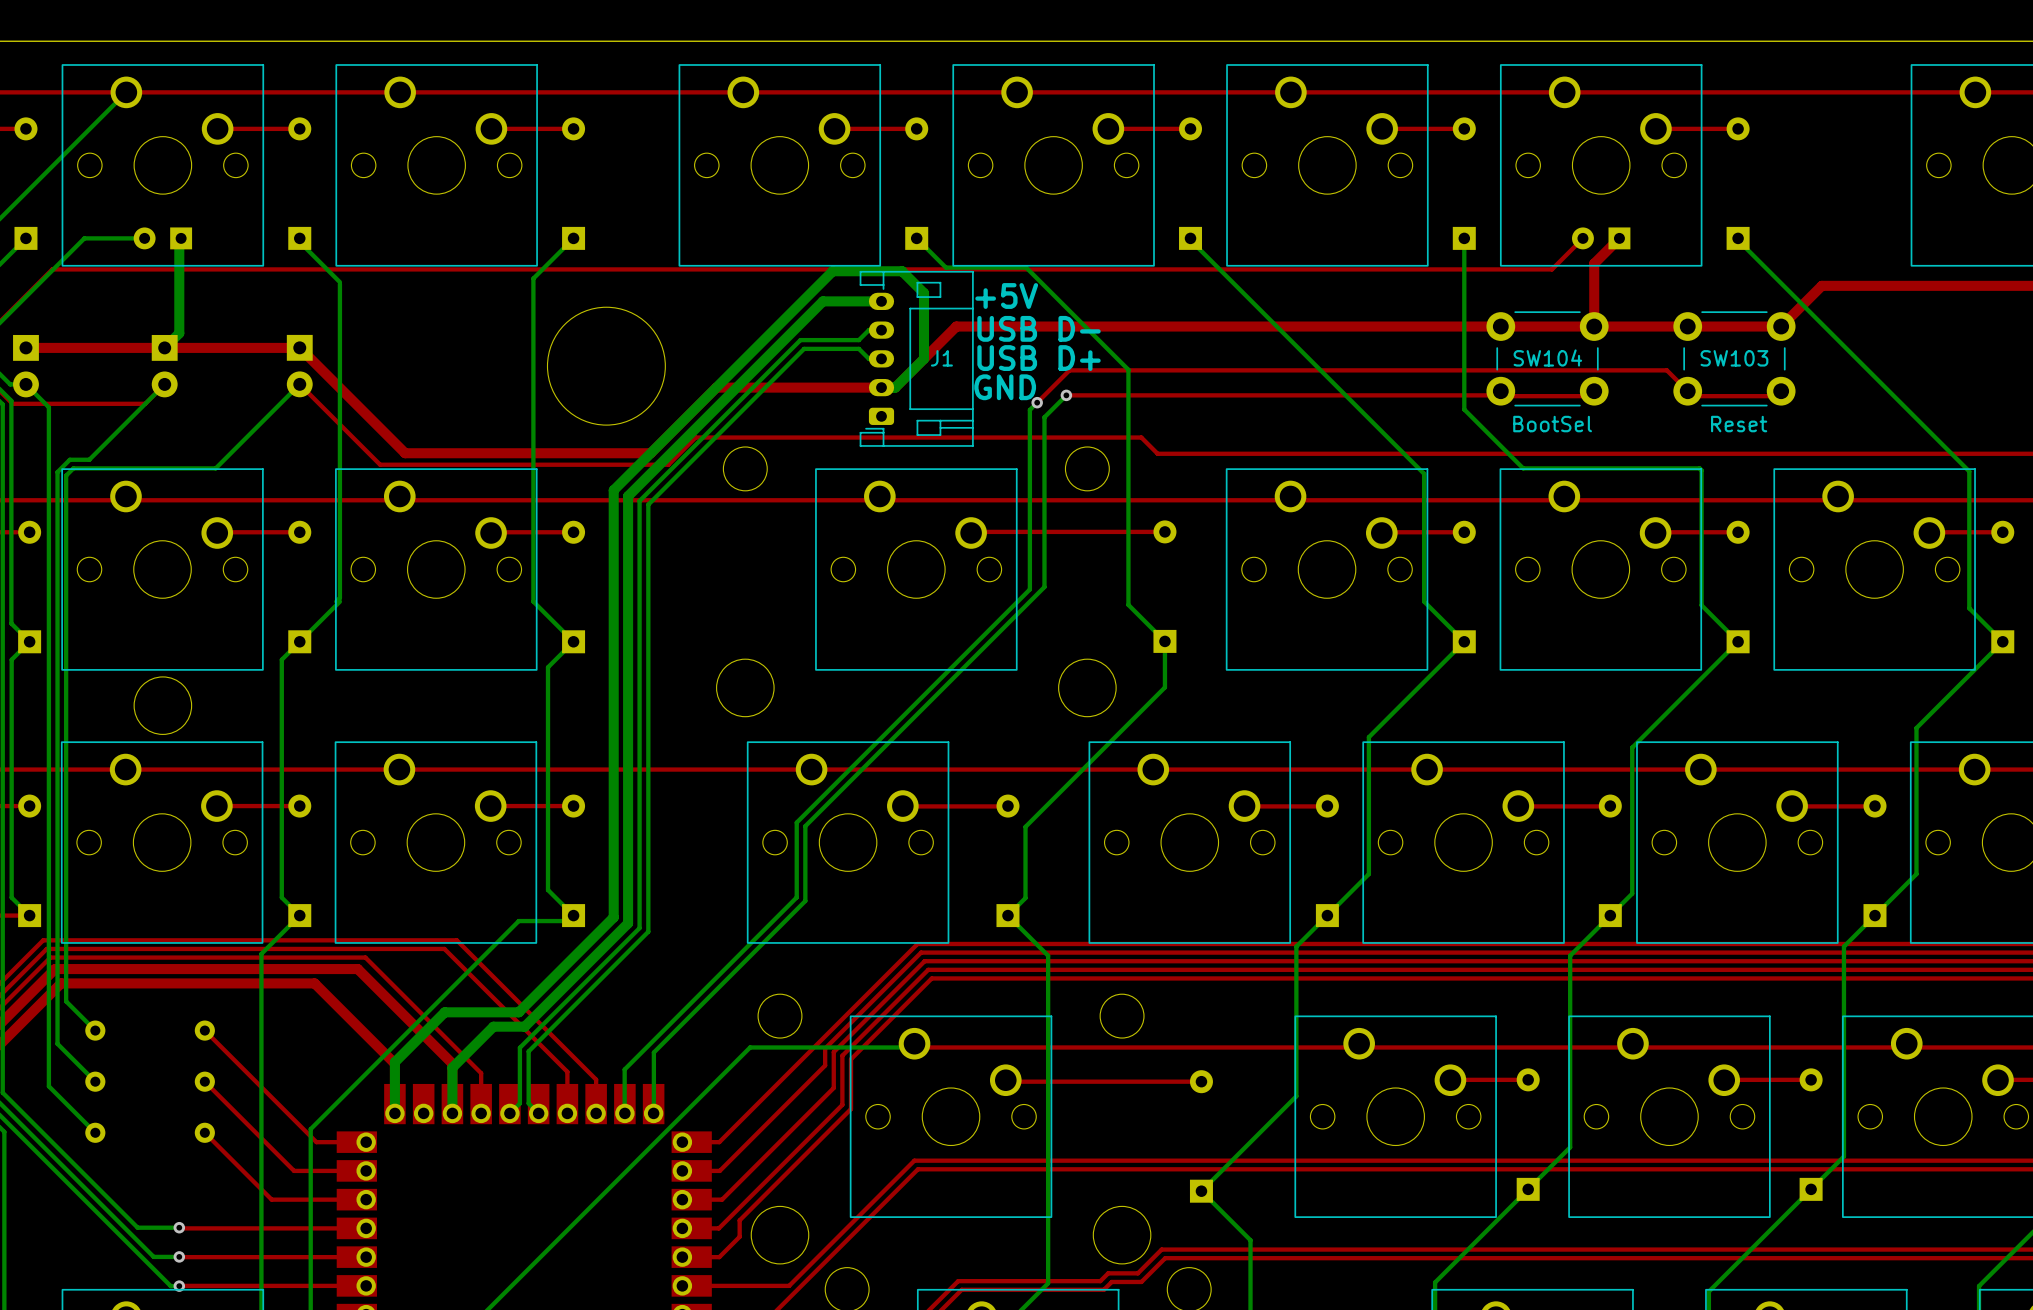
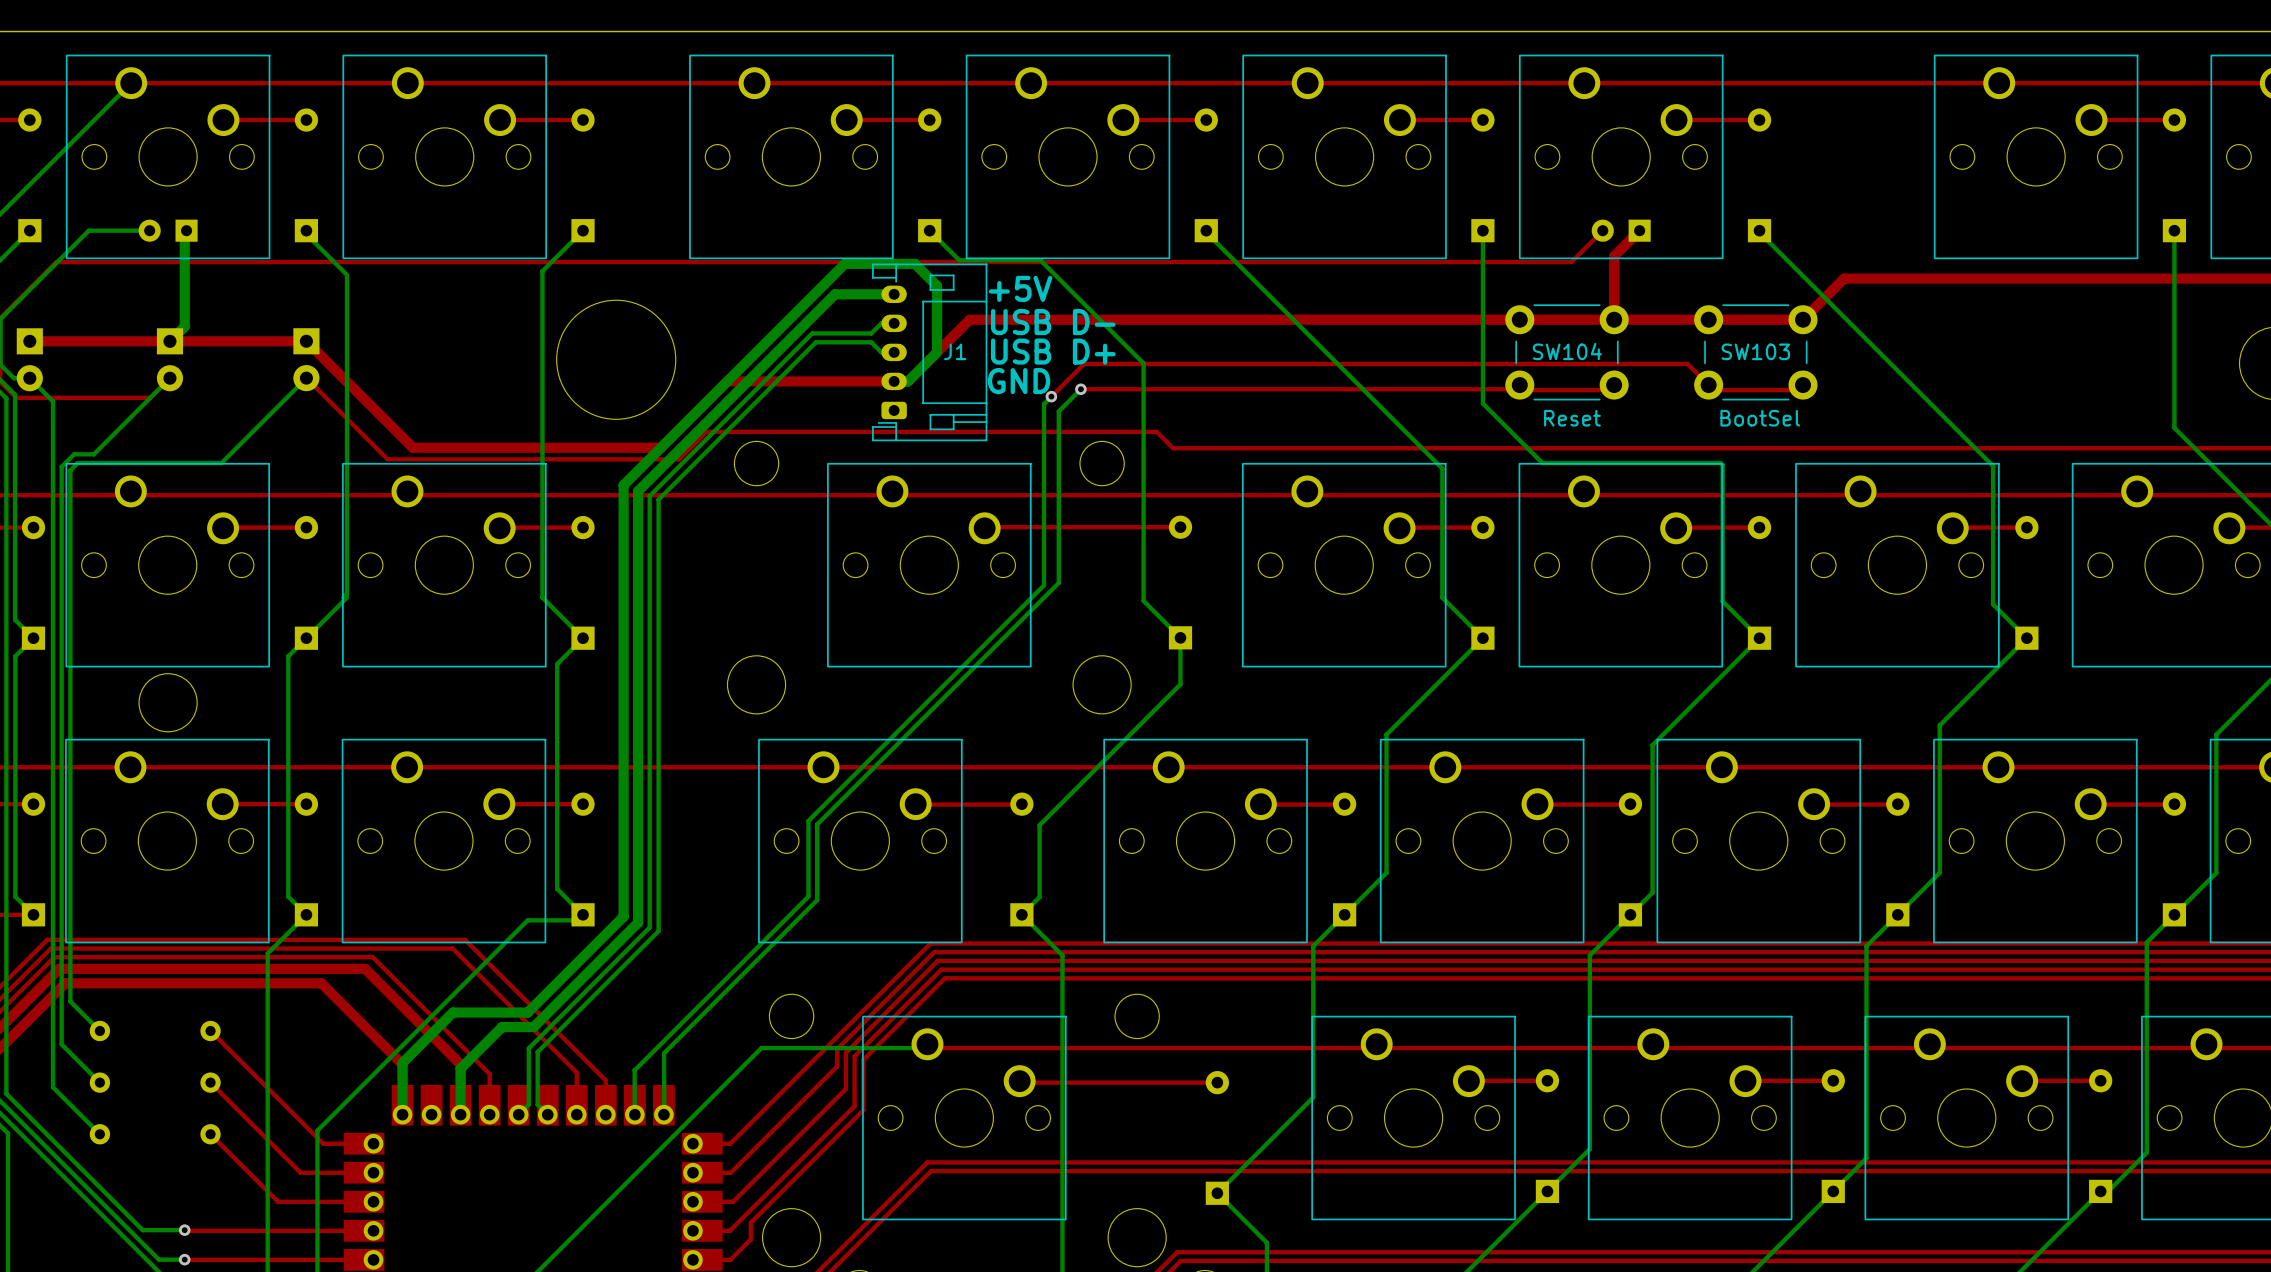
text: BootSel (1552, 424) -> Reset (1572, 418)
text: Reset (1739, 424) -> BootSel (1760, 418)

